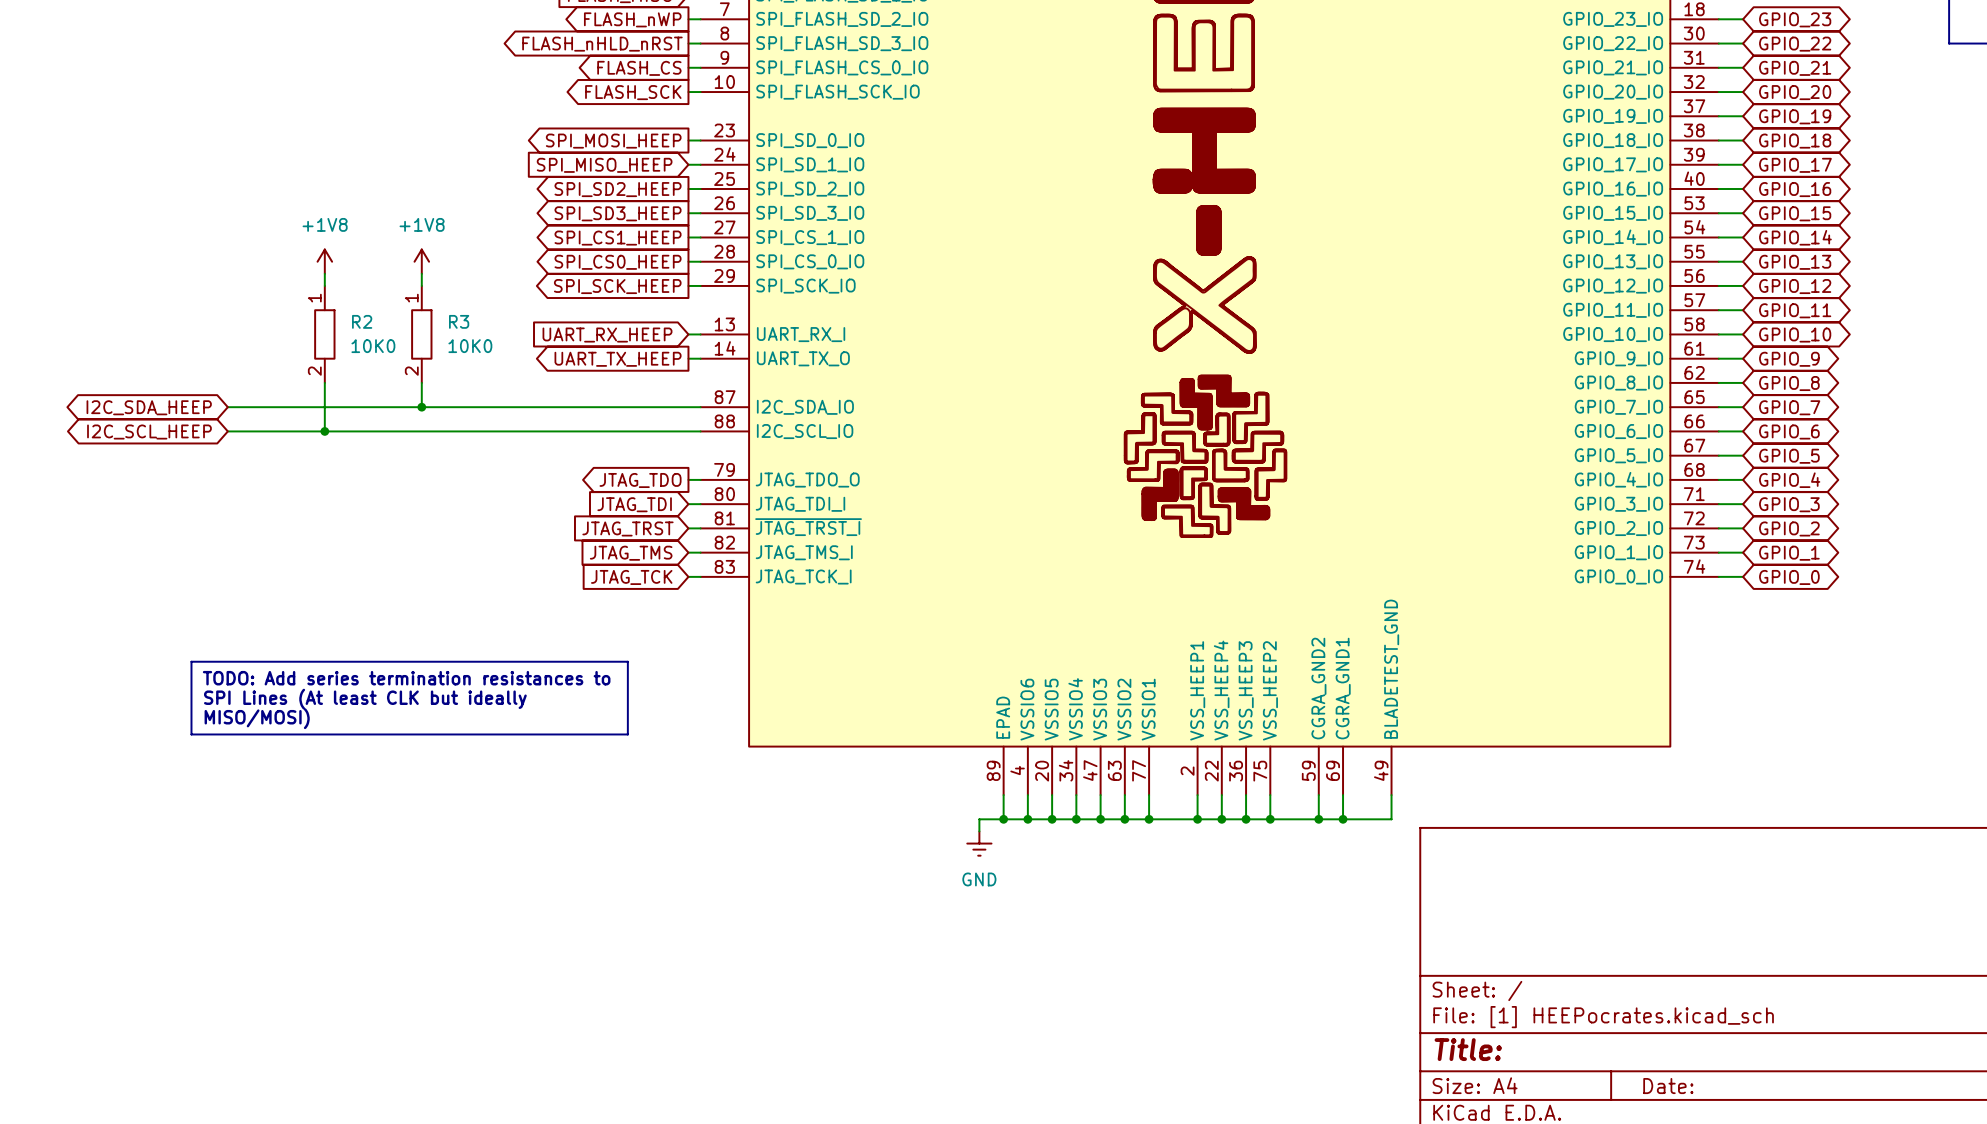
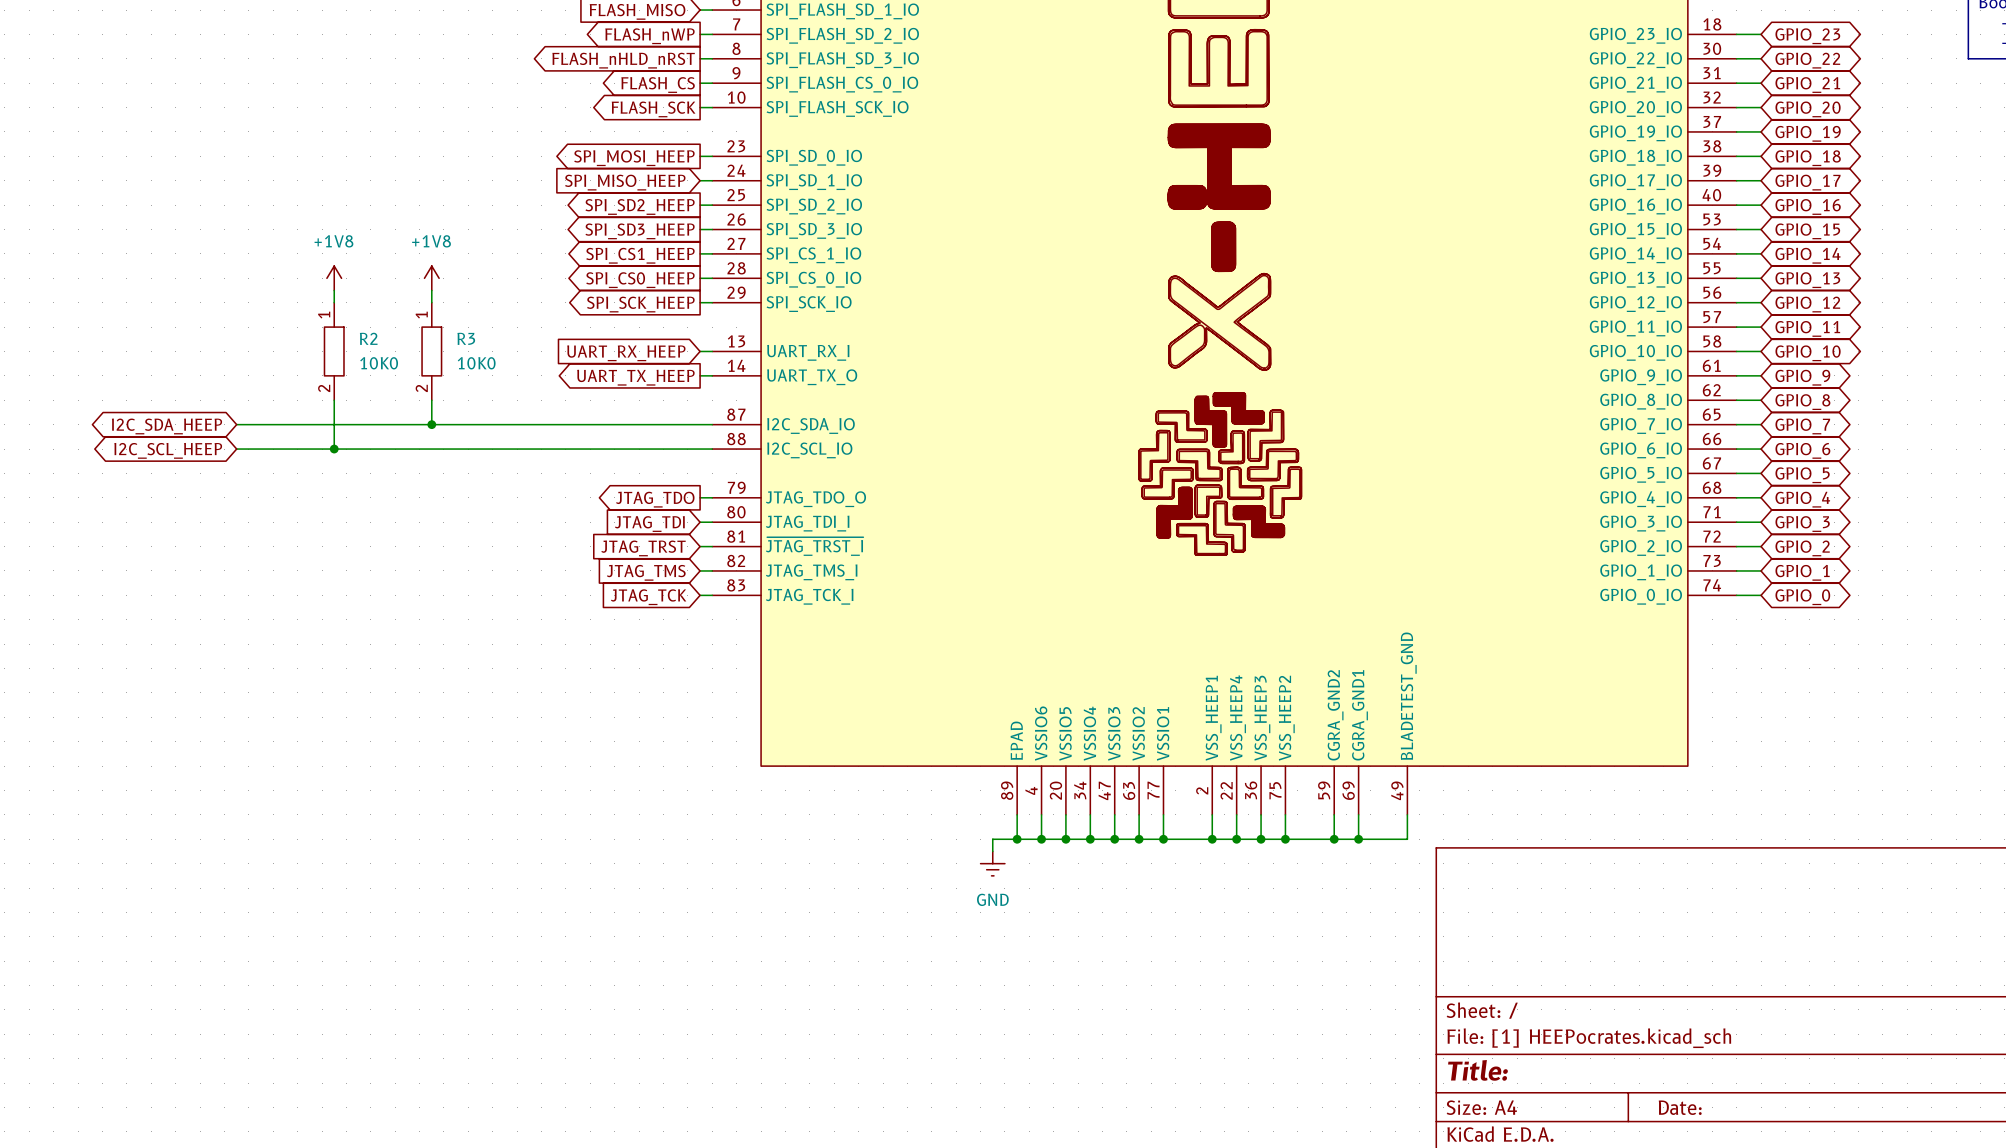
line: (191, 661) (627, 661) (627, 734) (191, 734) (191, 661) -> none
text: TODO: Add series termination resistances to (406, 678) -> none
text: SPI Lines (At least CLK but ideally (365, 699) -> none
text: MISO/MOSI) (257, 718) -> none

